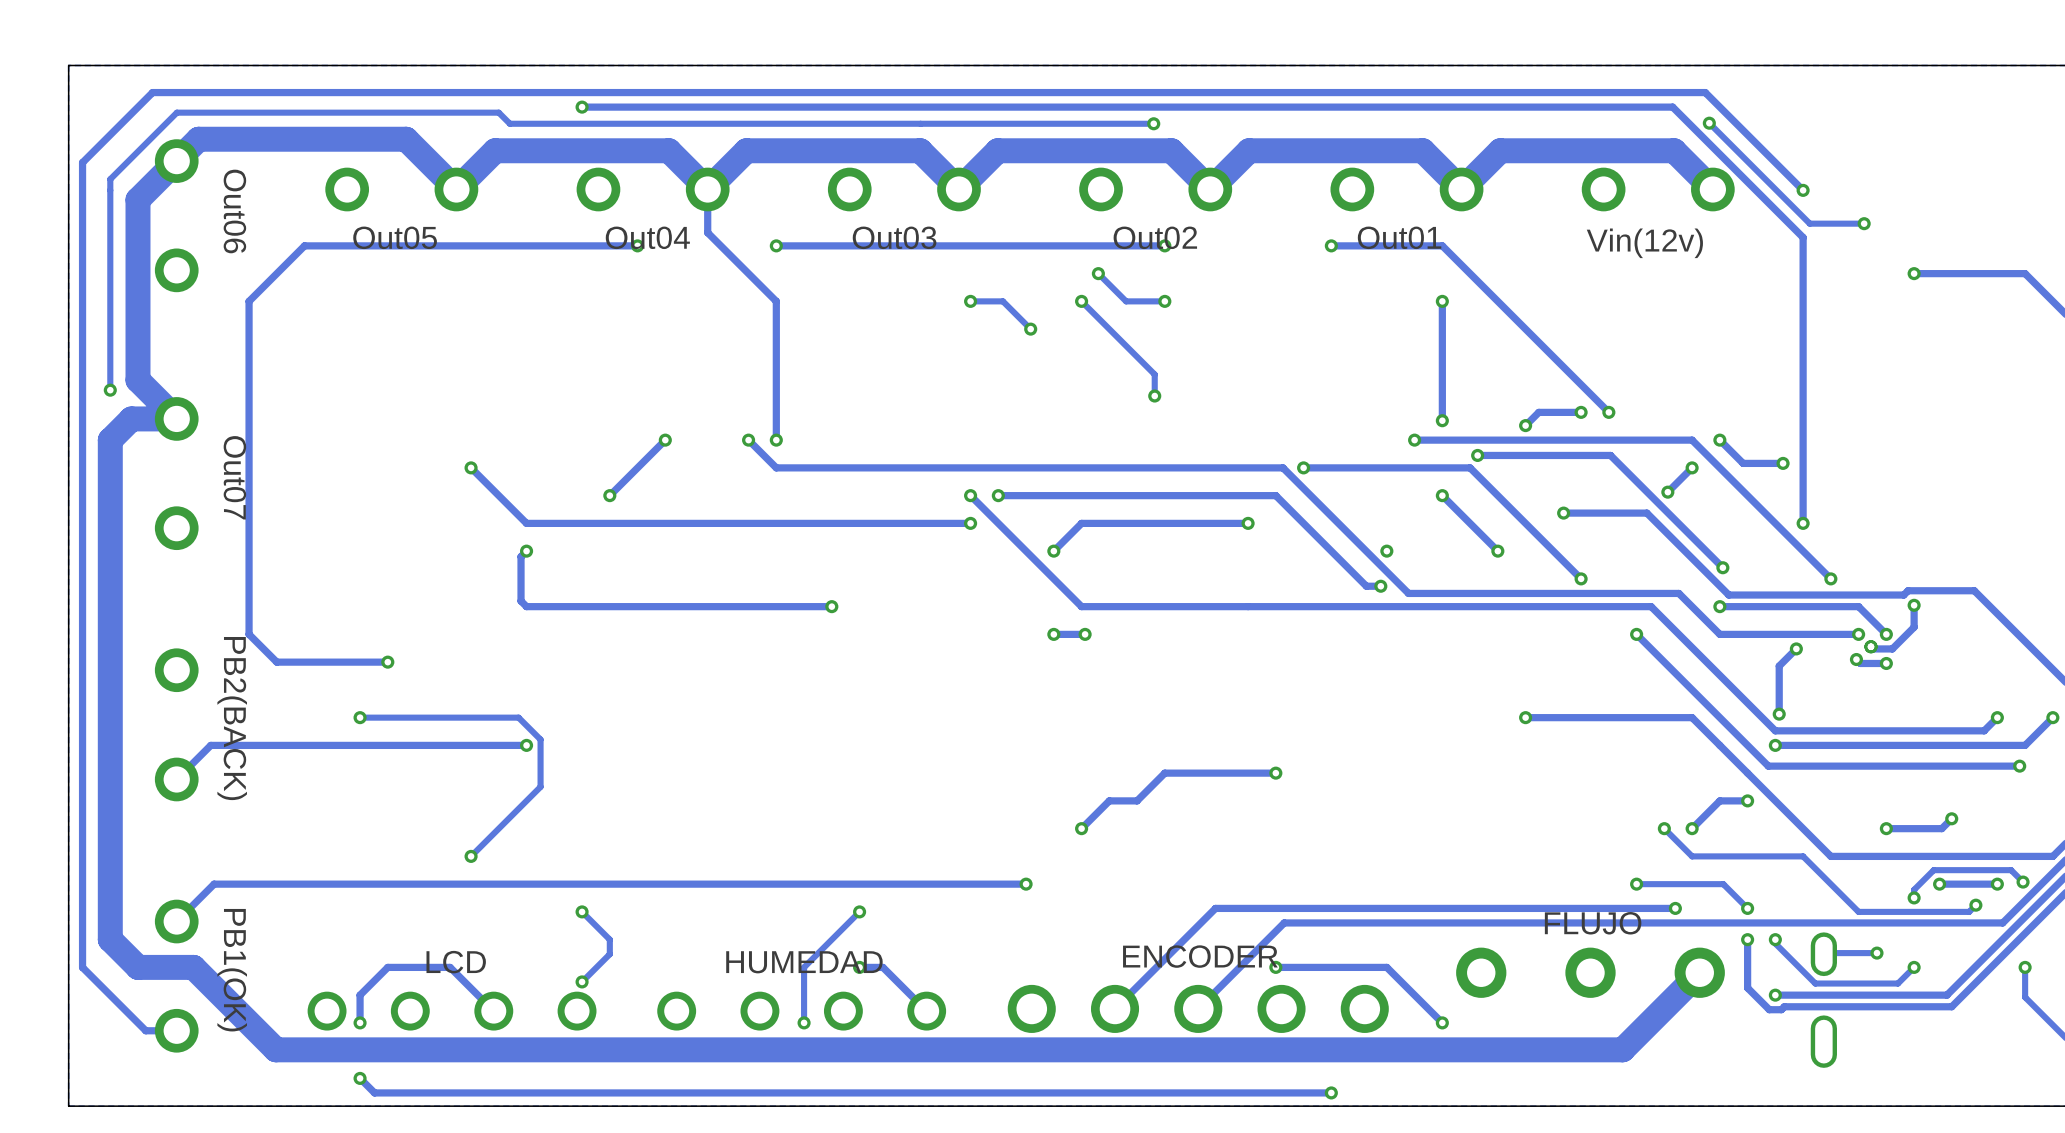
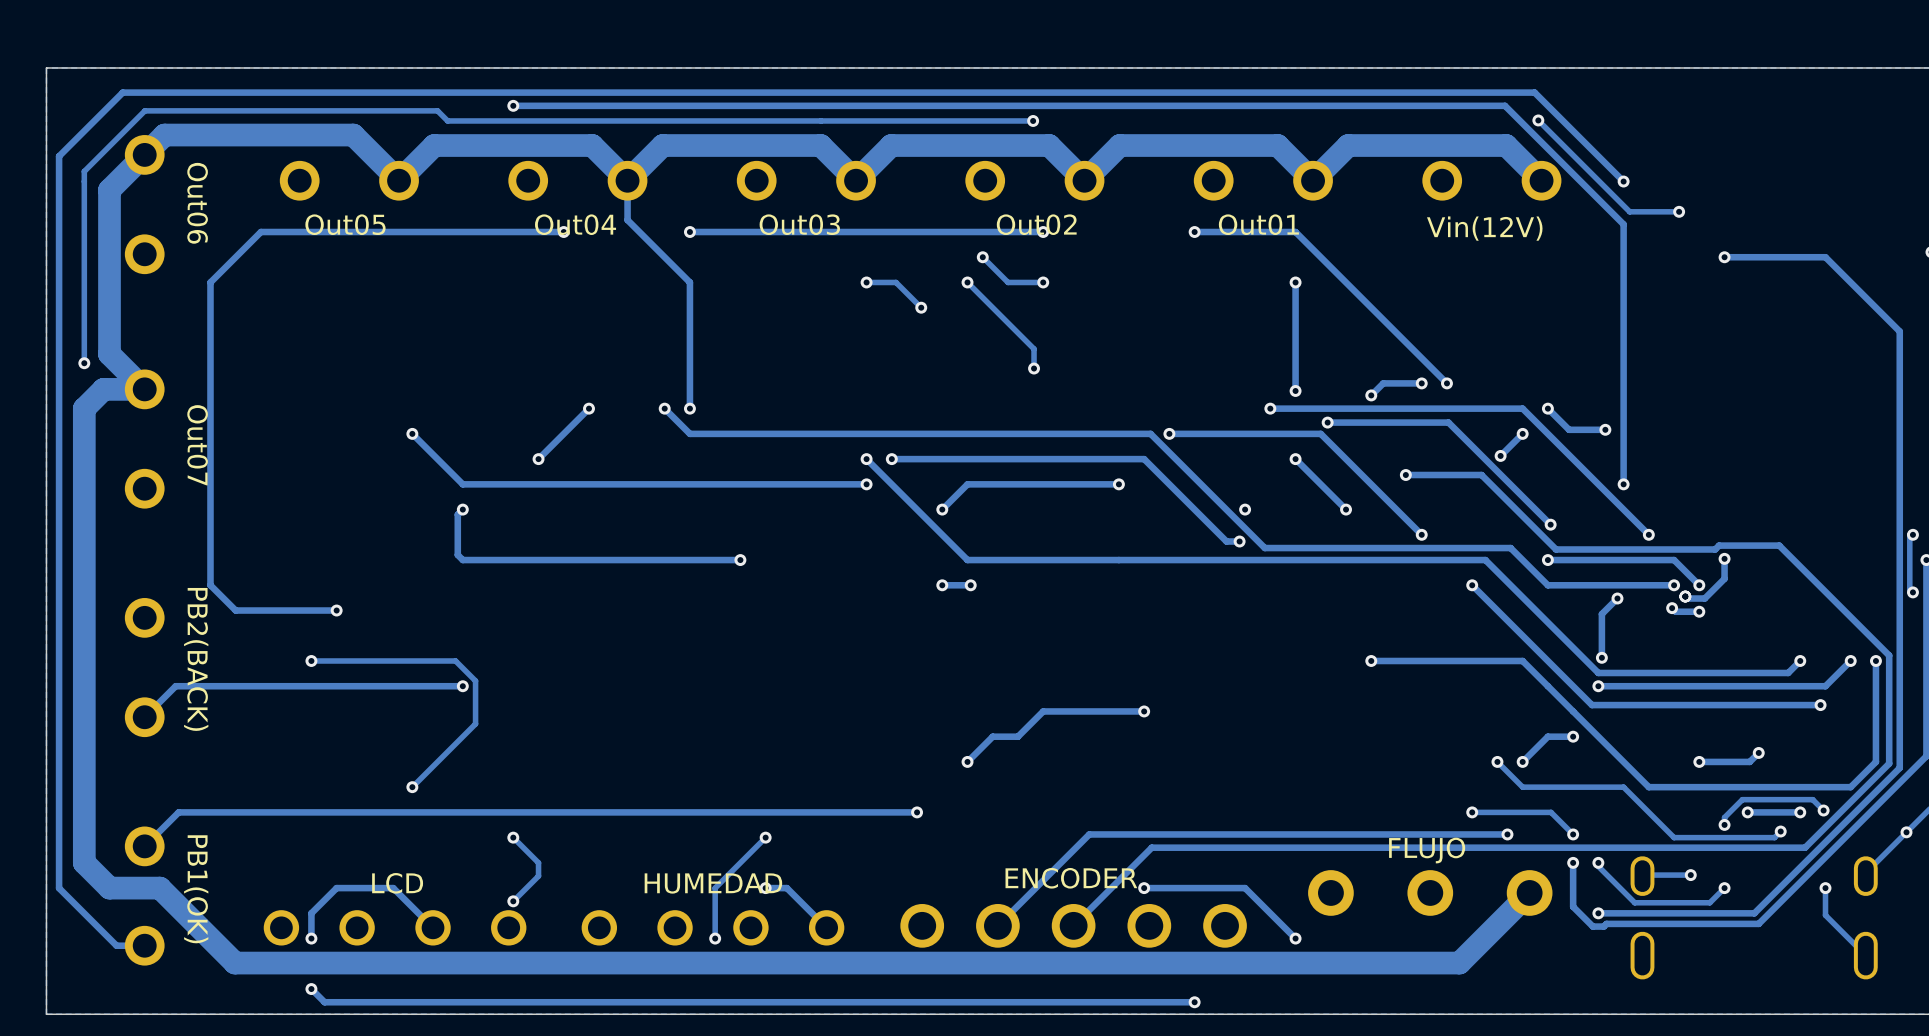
text: Vin(12v) (1644, 243) -> Vin(12V) (1484, 228)

